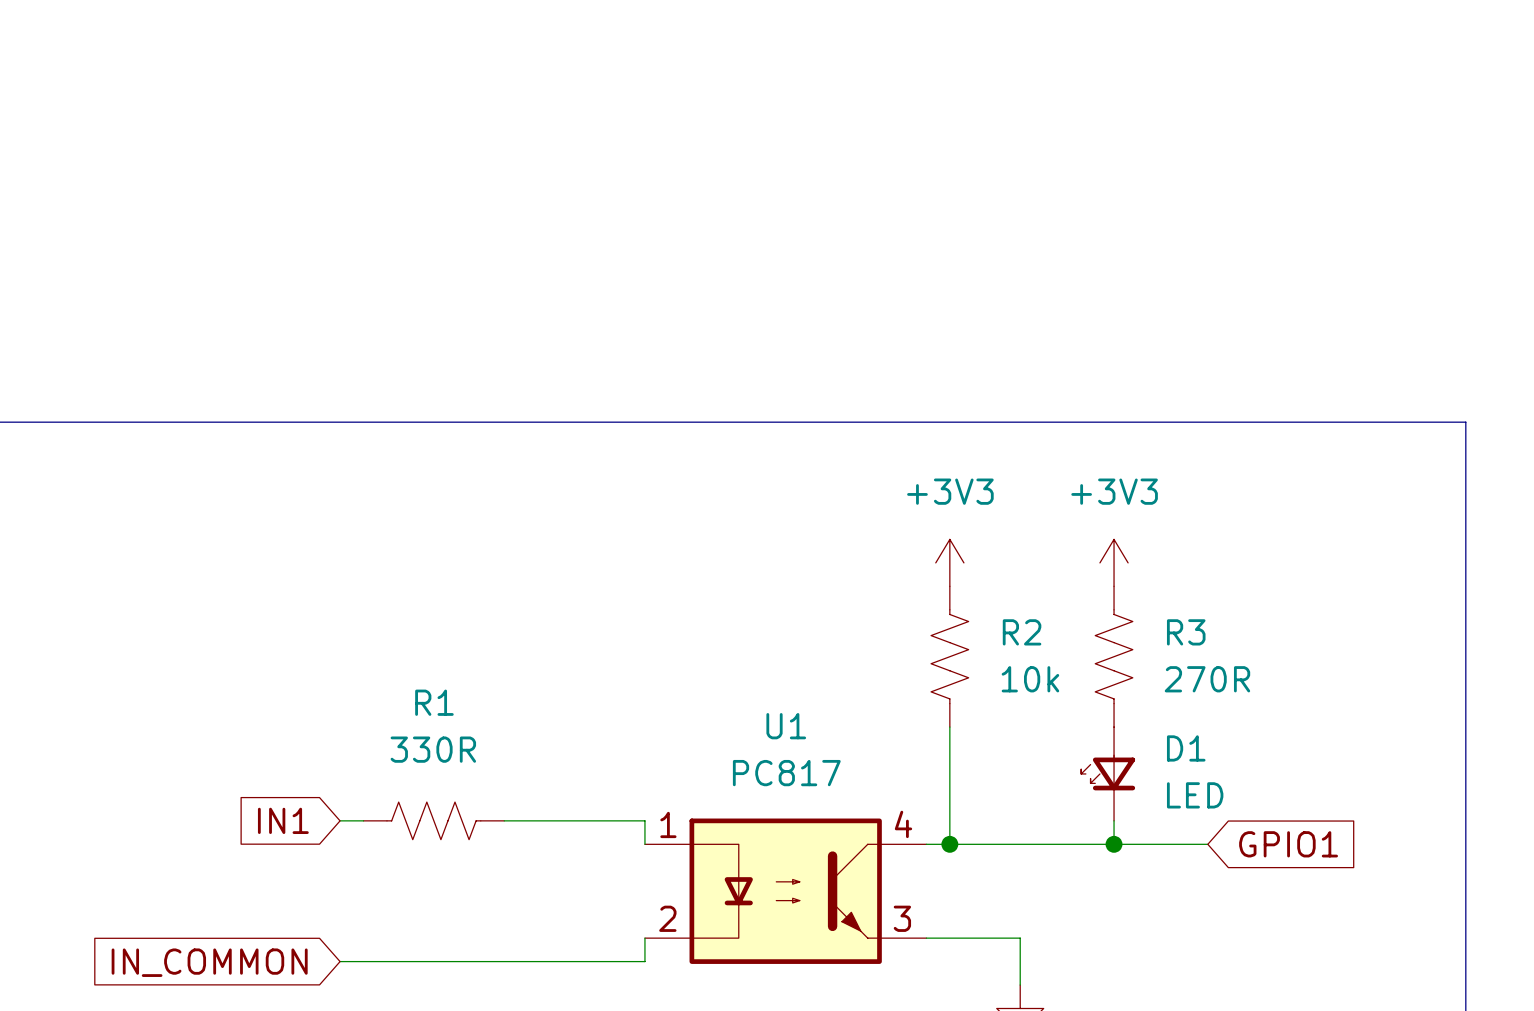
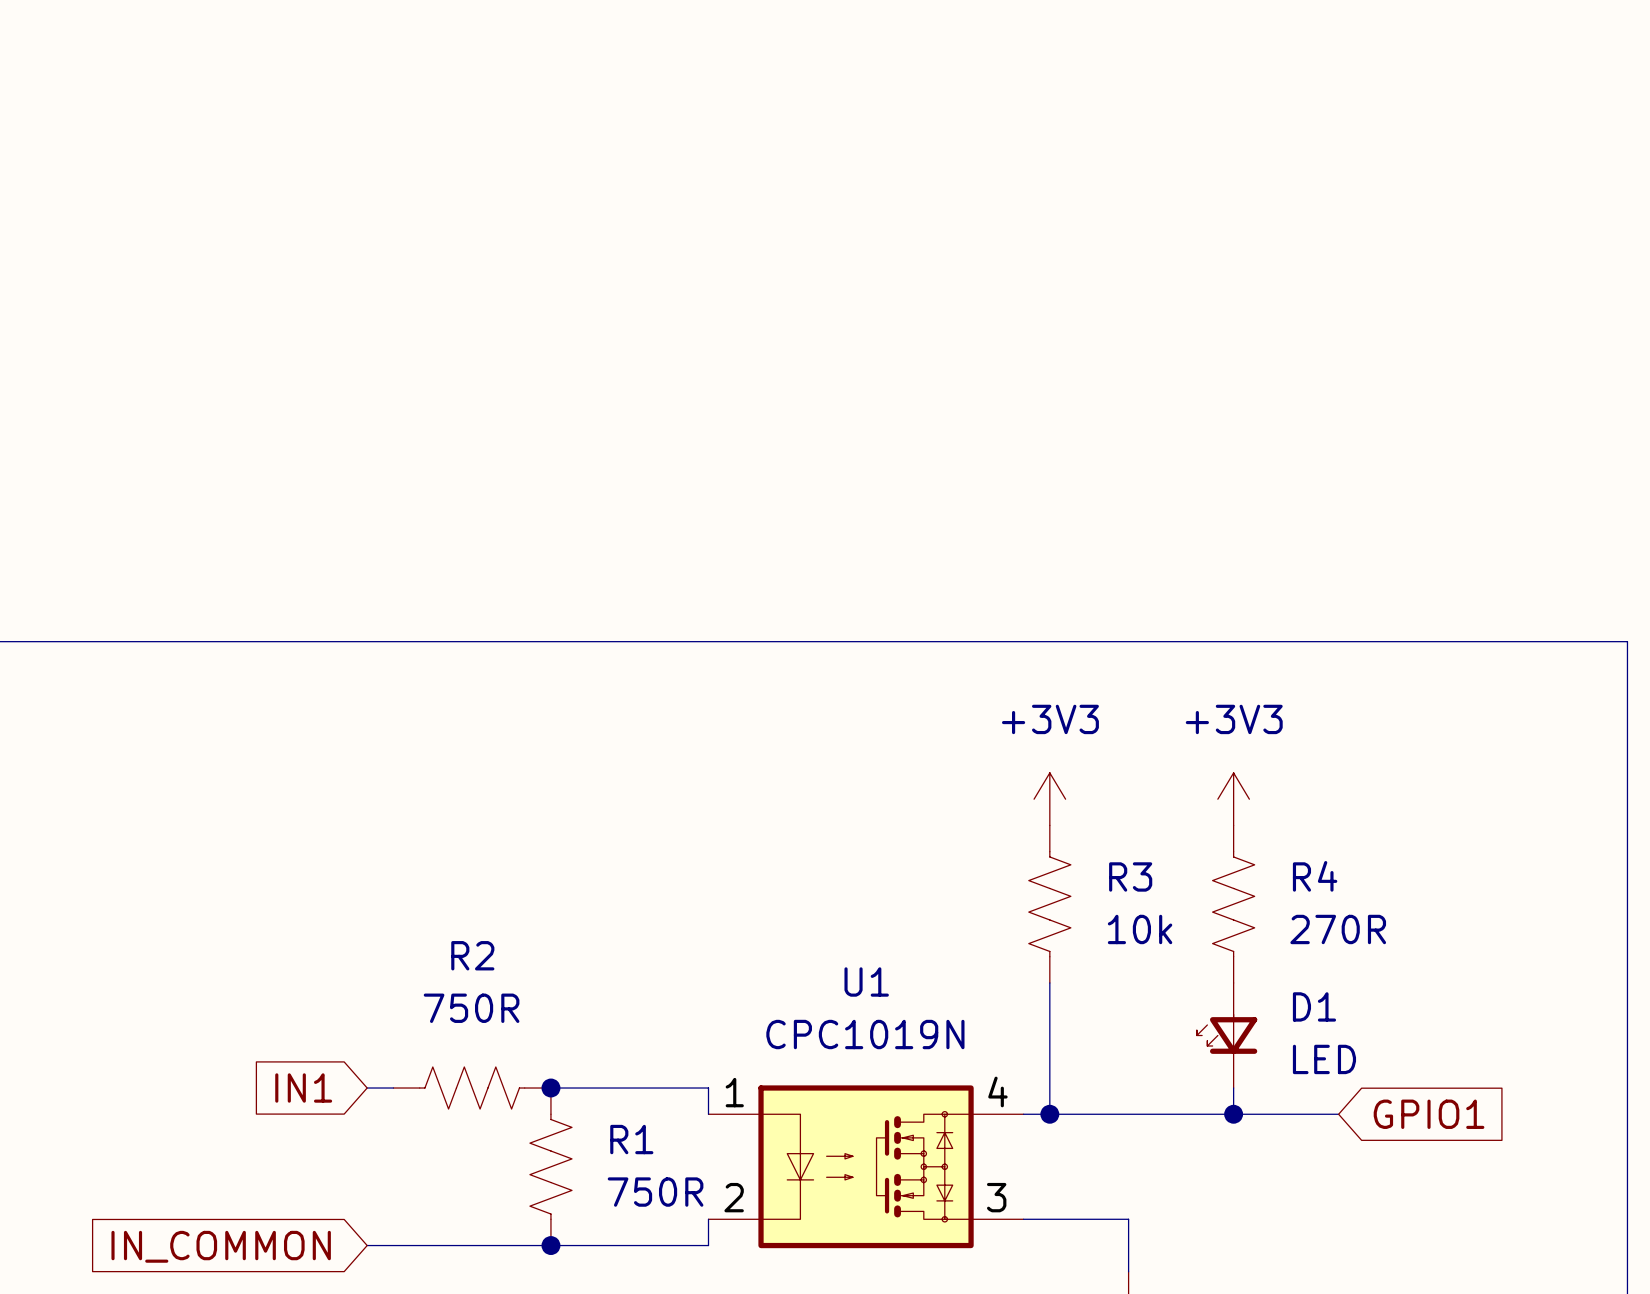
R2 name: R2 (1022, 632) -> R3 (1130, 876)
R3 name: R3 (1186, 632) -> R4 (1315, 876)
R1 name: R1 (434, 702) -> R2 (472, 955)
R1 value: 330R (433, 749) -> 750R (471, 1008)
U1 value: PC817 (786, 773) -> CPC1019N (865, 1034)
U1 symbol: [644, 818, 927, 964] -> [708, 1085, 1024, 1249]
junction: none -> (550, 1088)
R1: none -> 750R (550, 1166)
junction: none -> (550, 1245)

